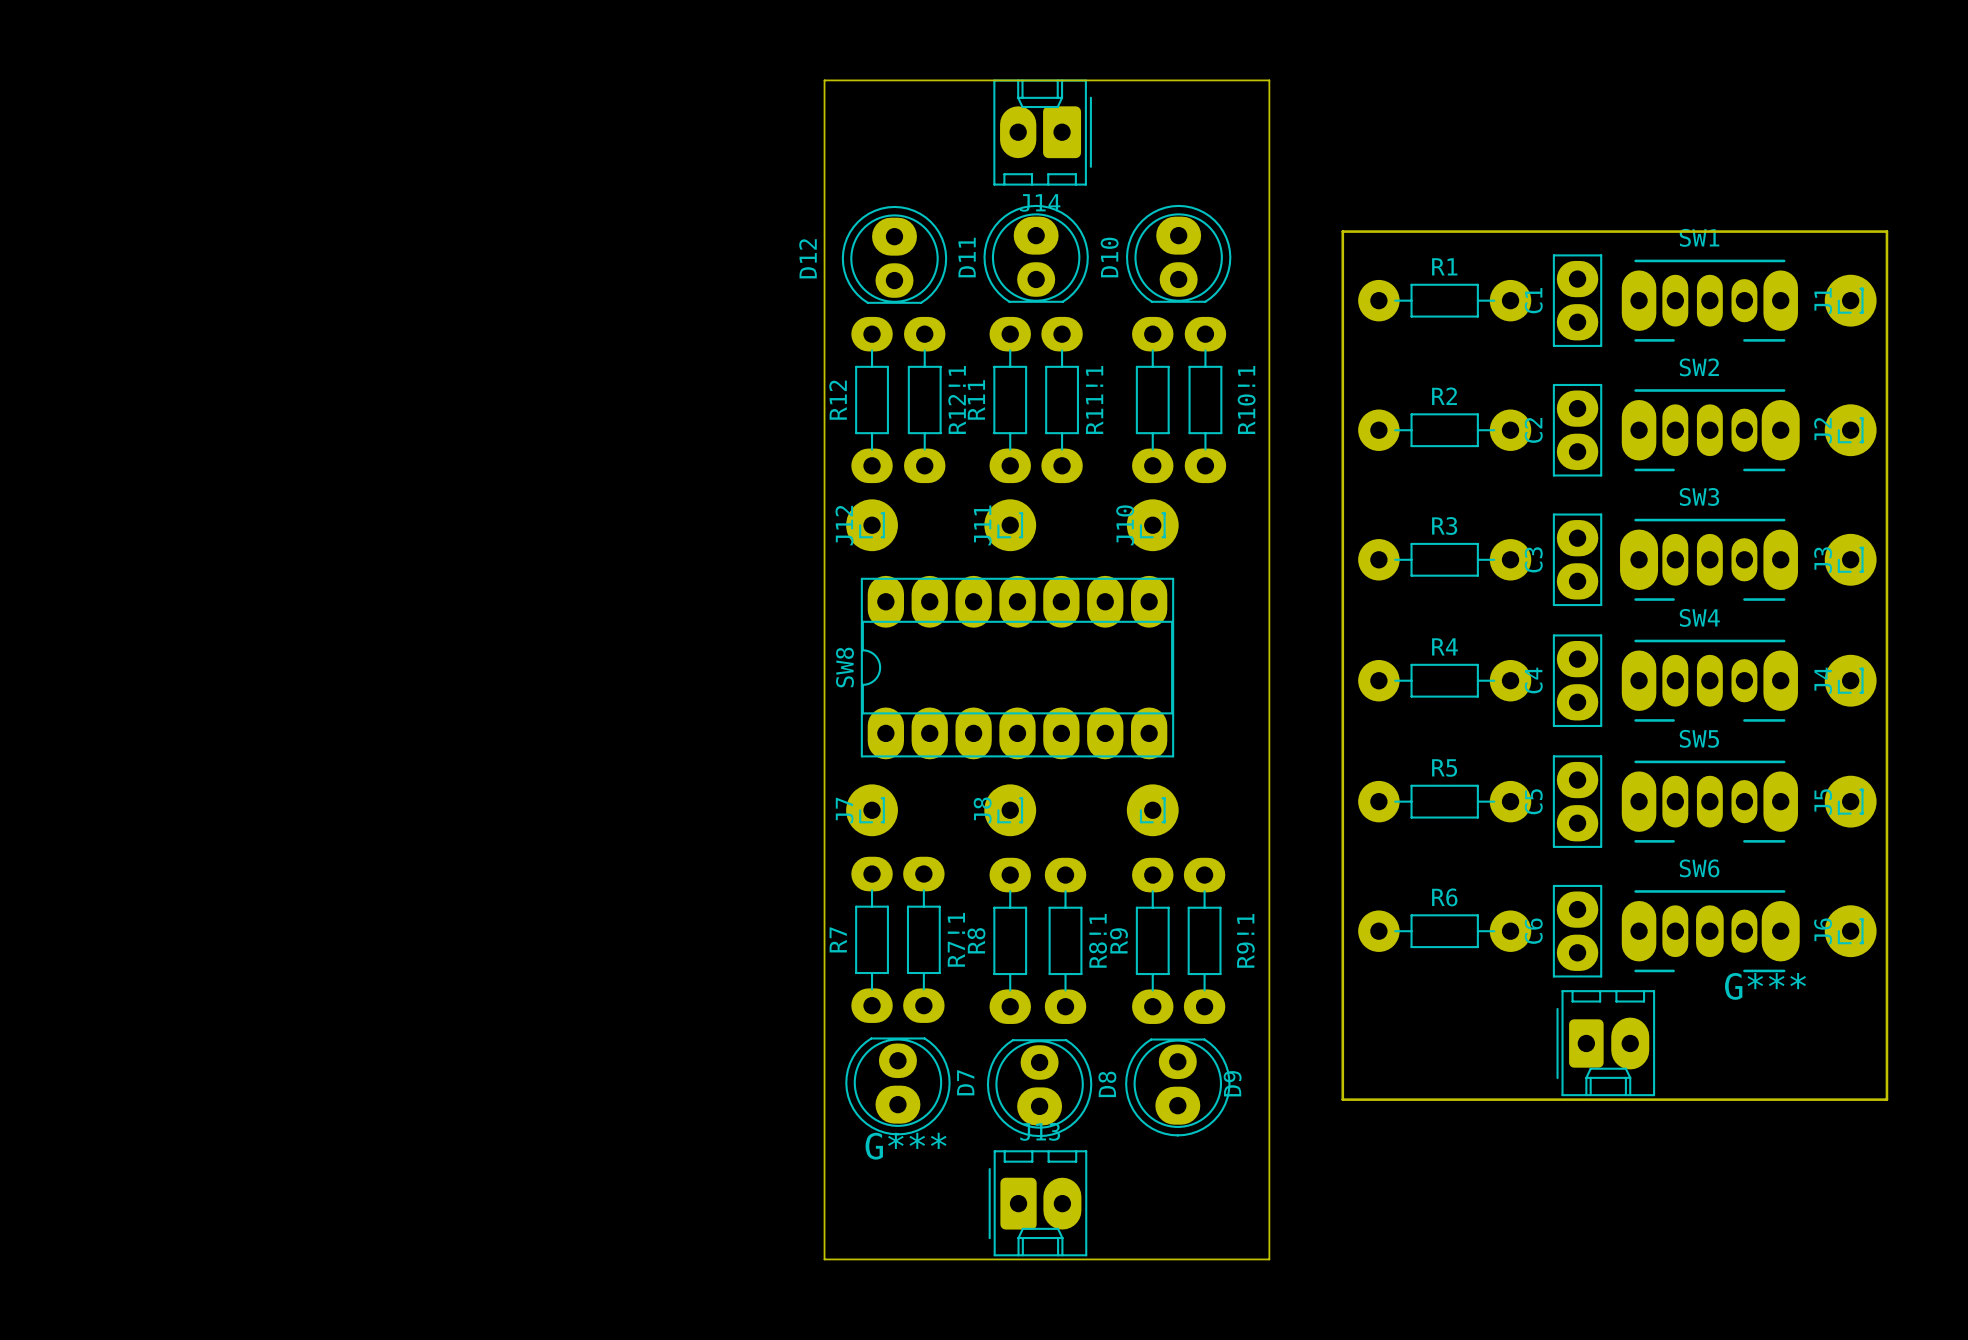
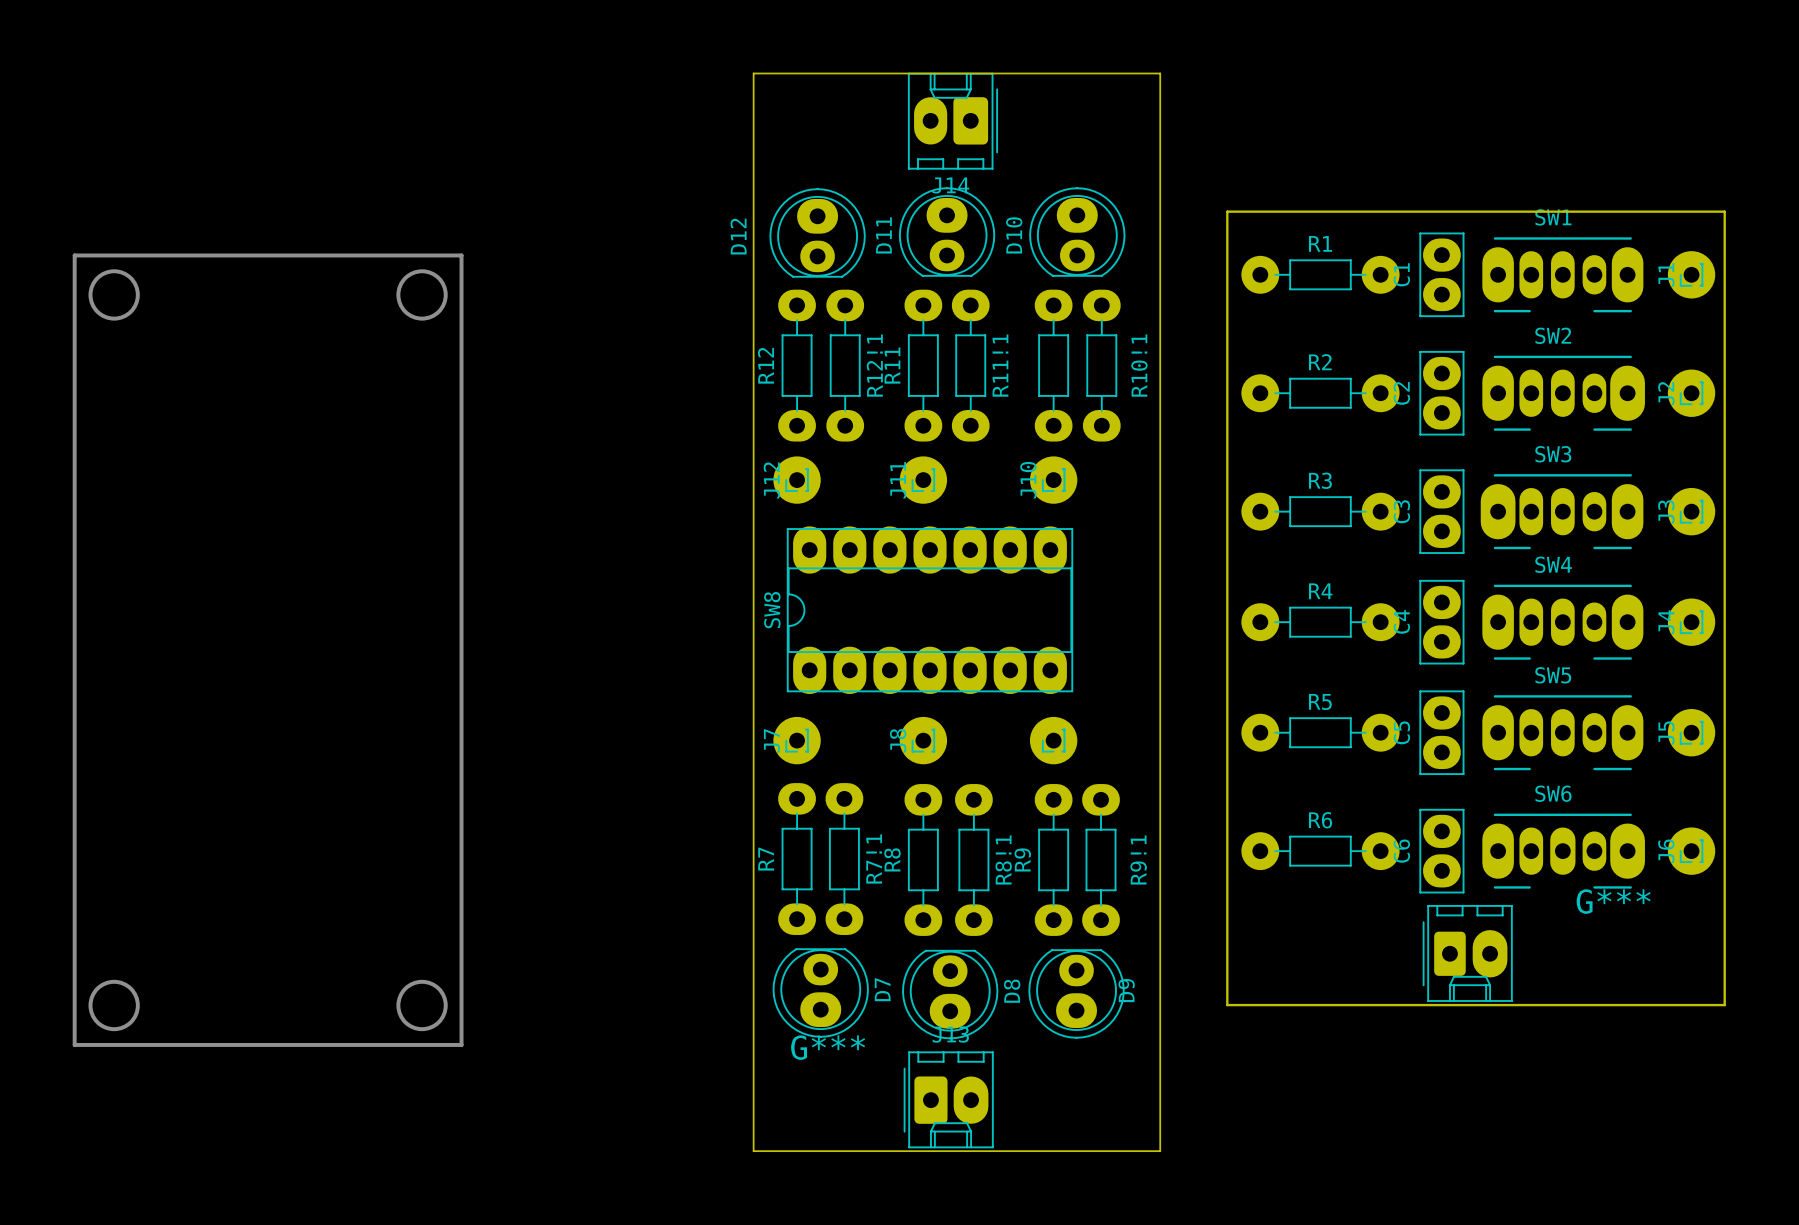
line: none -> (74, 255) (74, 1044) (461, 1044) (461, 255) (74, 255)
drawing: none -> [88, 269, 140, 321]
drawing: none -> [396, 269, 448, 321]
drawing: none -> [88, 979, 140, 1032]
drawing: none -> [396, 979, 448, 1032]

